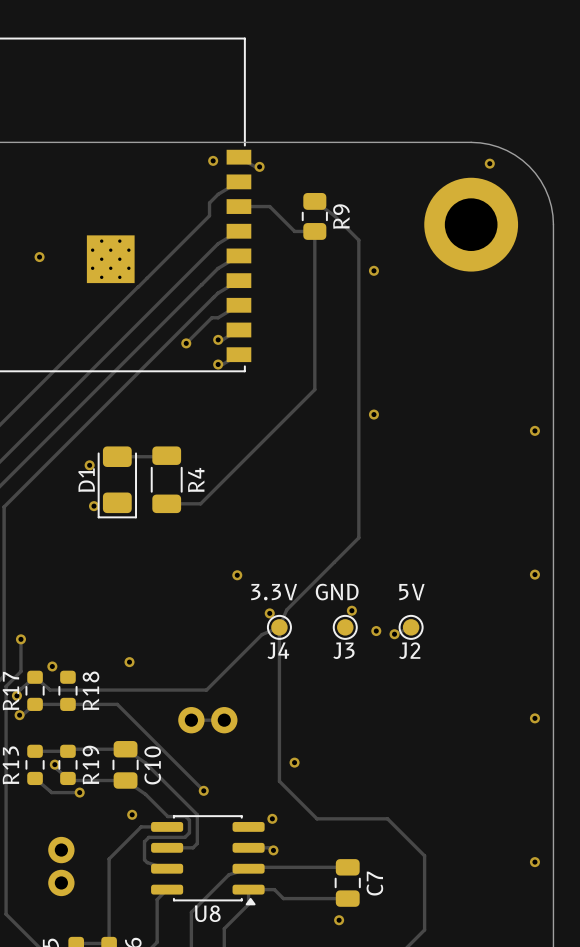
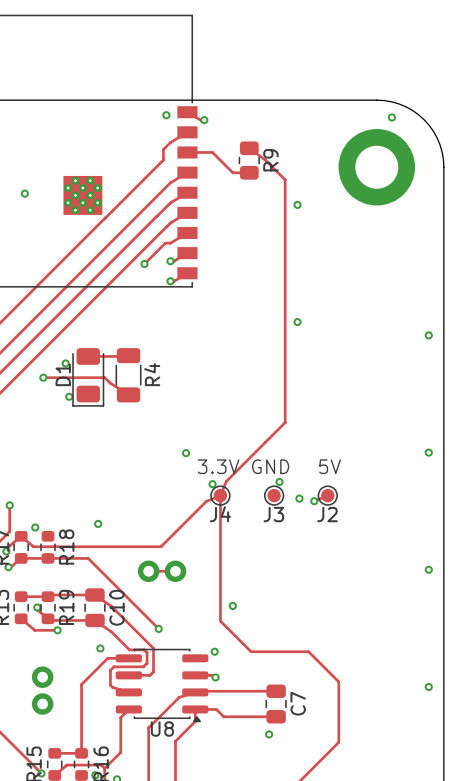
track: (314, 231) (314, 389) (200, 503) (166, 503) -> (43, 377) (104, 377) (128, 394)
via: none -> (43, 377)

